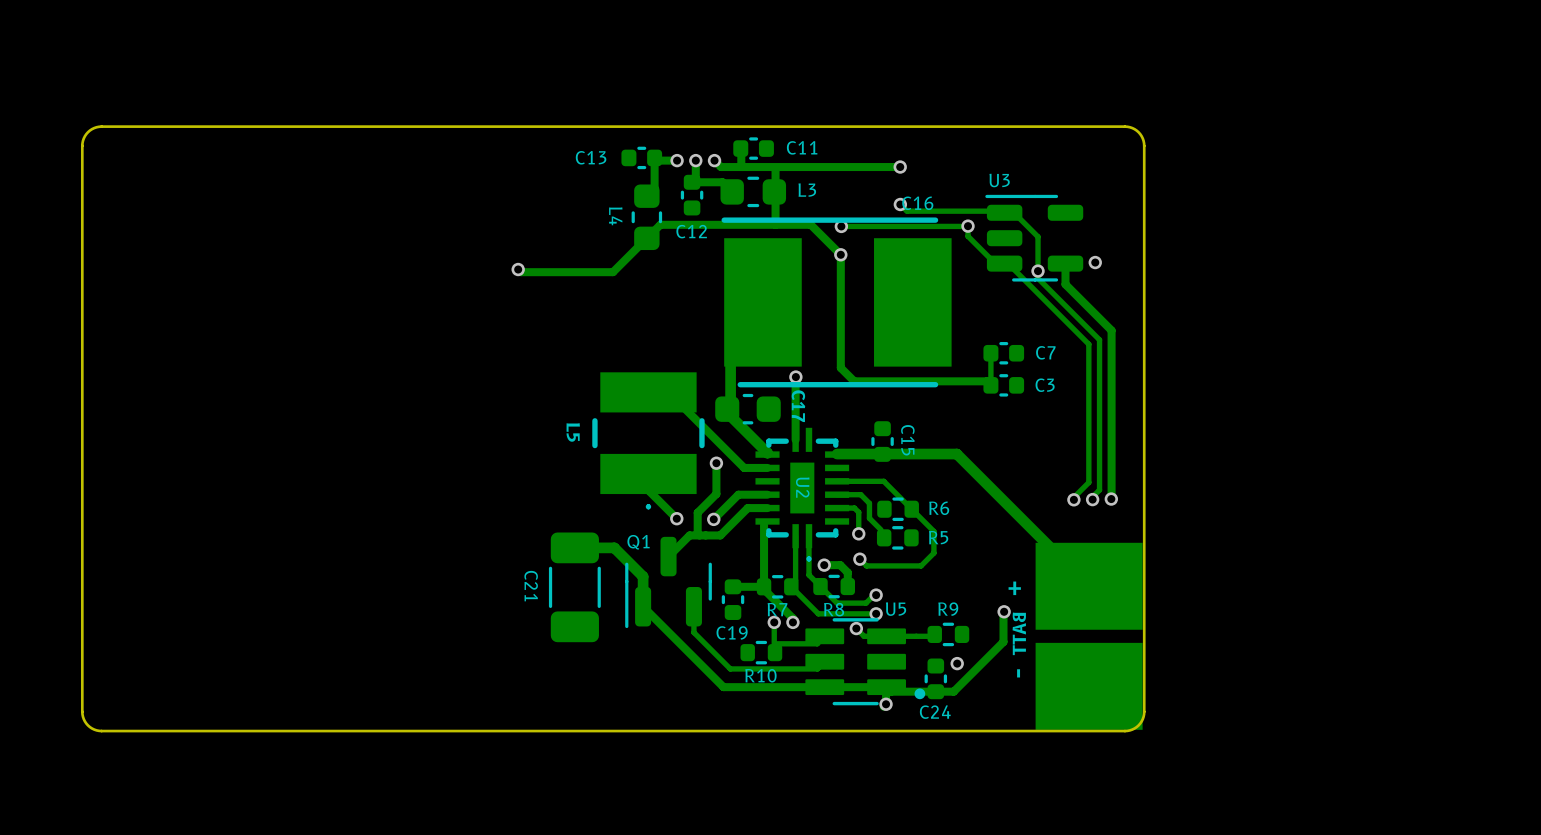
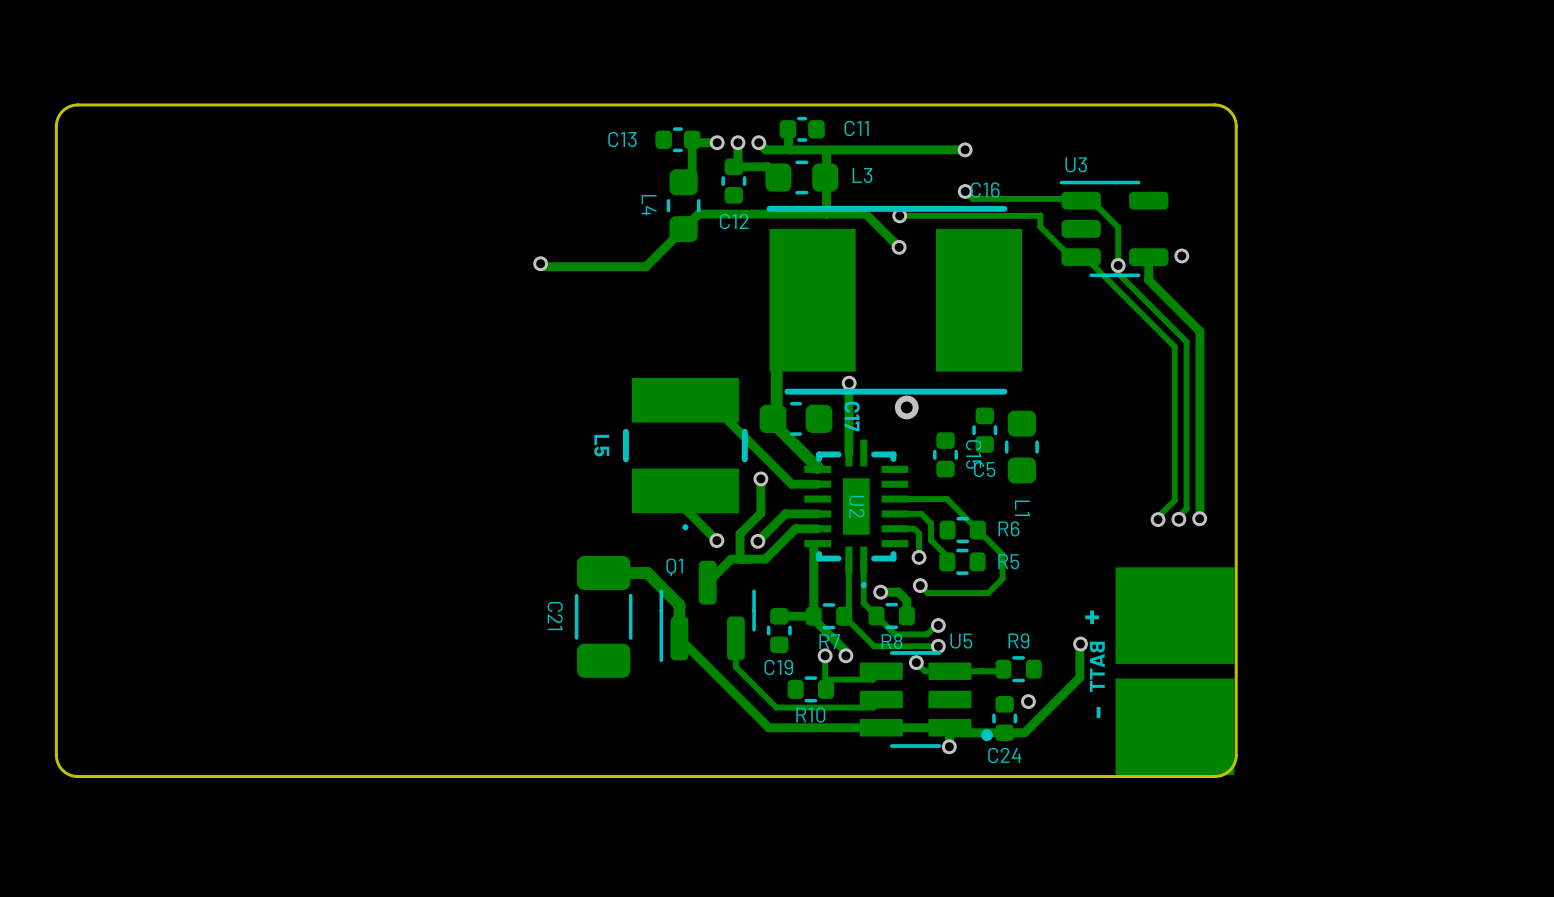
via: (968, 226) -> none
track: (840, 254) (840, 367) (854, 381) (986, 381) (990, 385) (990, 353) -> none
C7: (1003, 353) -> none
C3: (1003, 385) -> none
via: none -> (906, 407)
C5: none -> (984, 430)
L1: none -> (1021, 447)
track: (837, 454) (956, 454) (1089, 586) -> none

